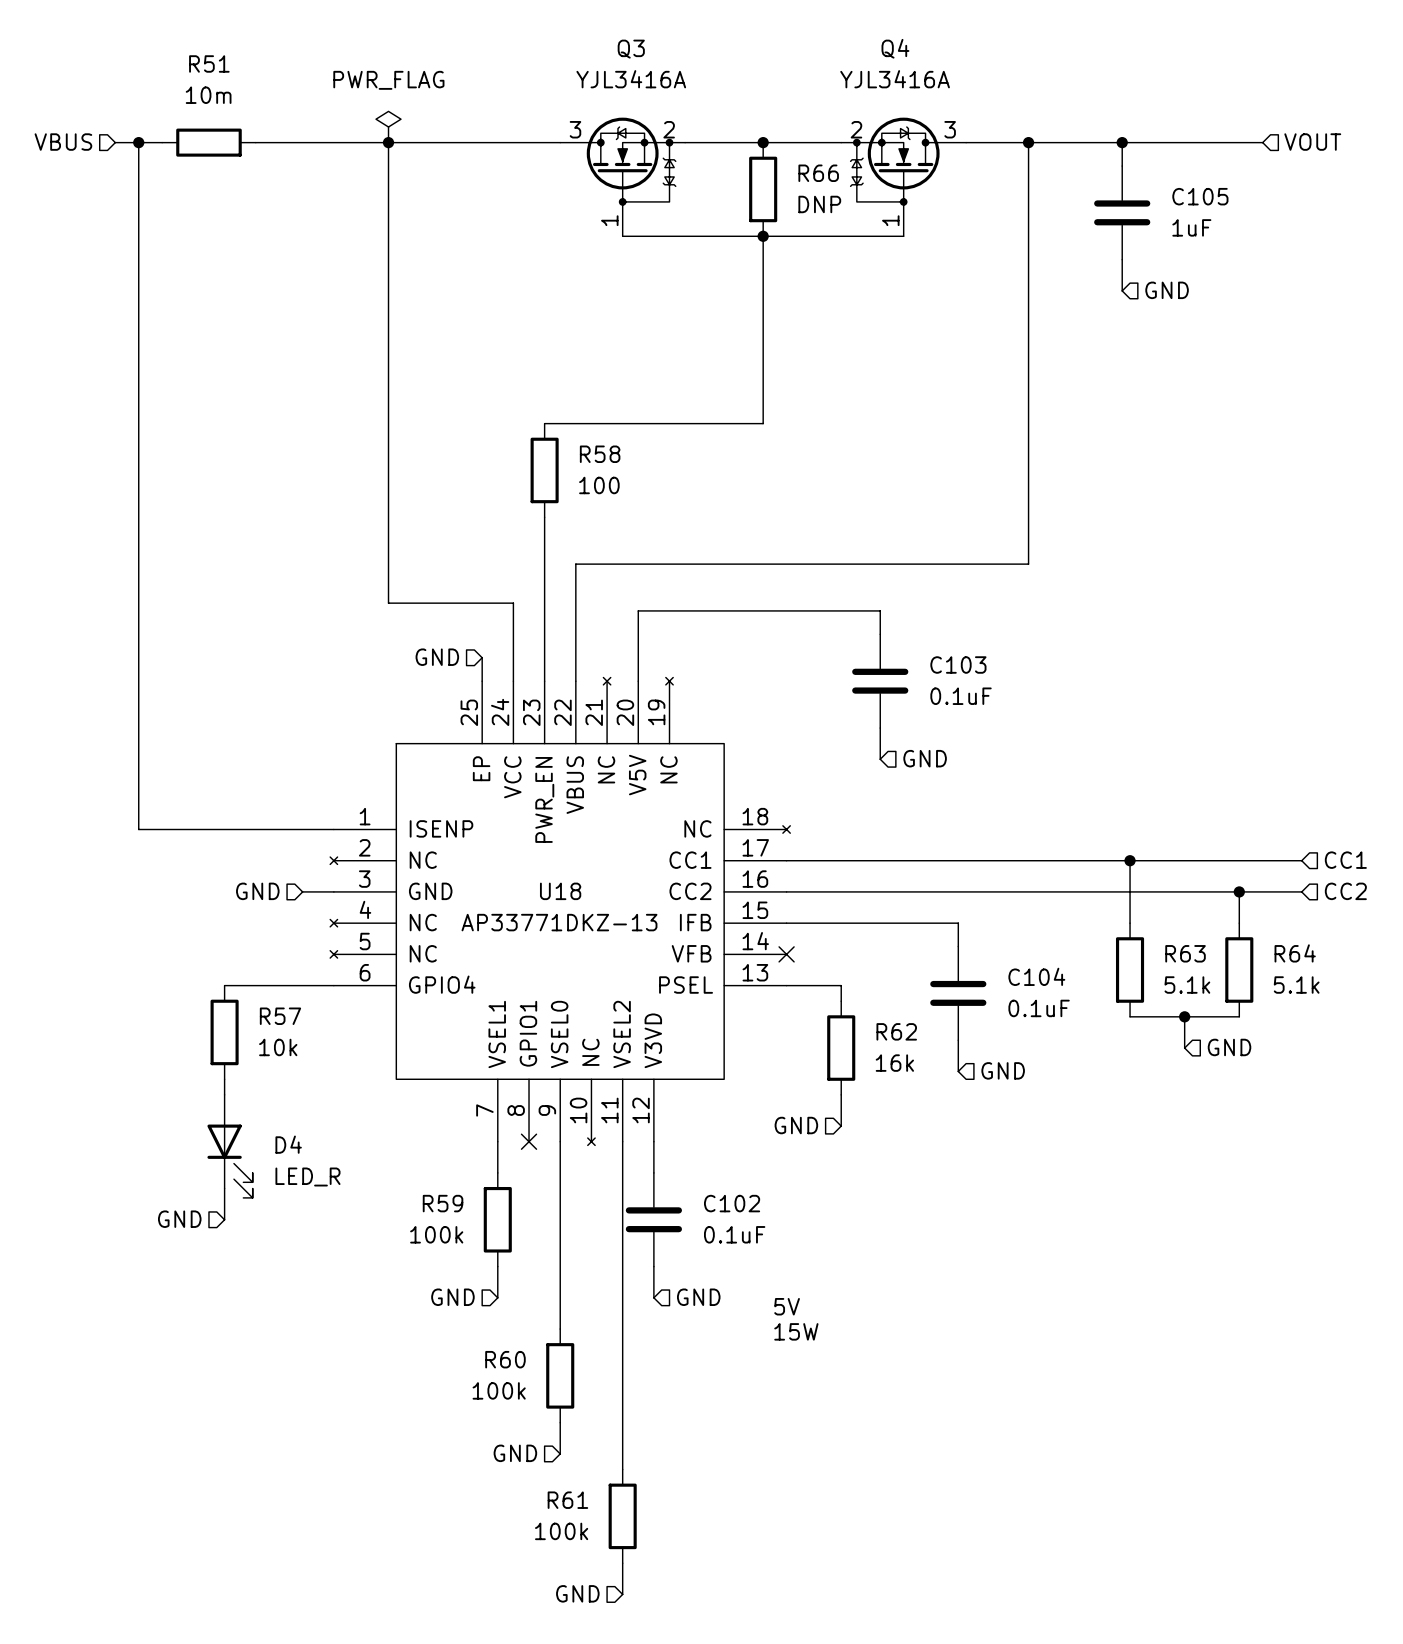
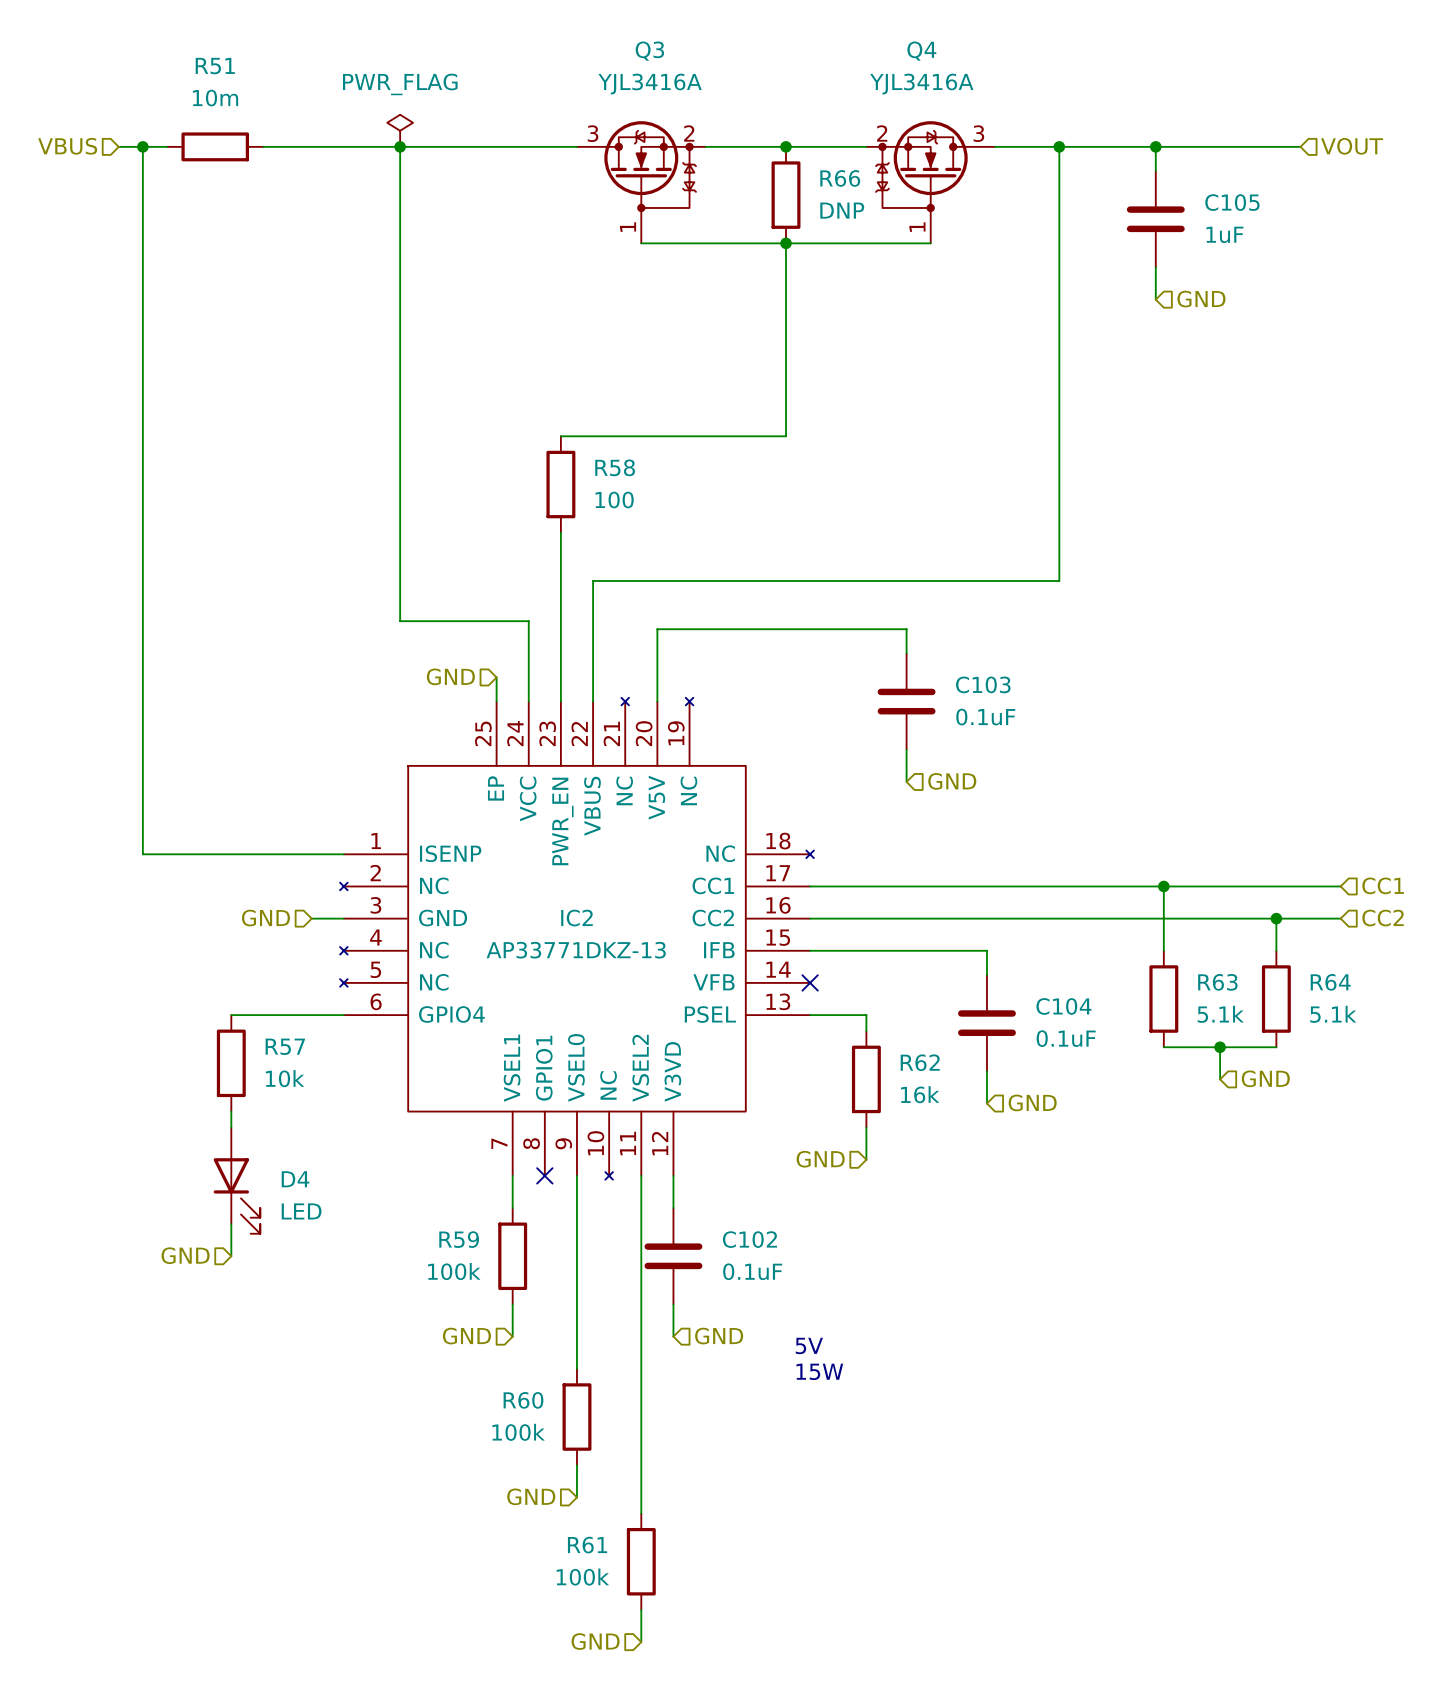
U18 name: U18 (560, 891) -> IC2 (576, 918)
D4 value: LED_R (307, 1177) -> LED (301, 1211)

